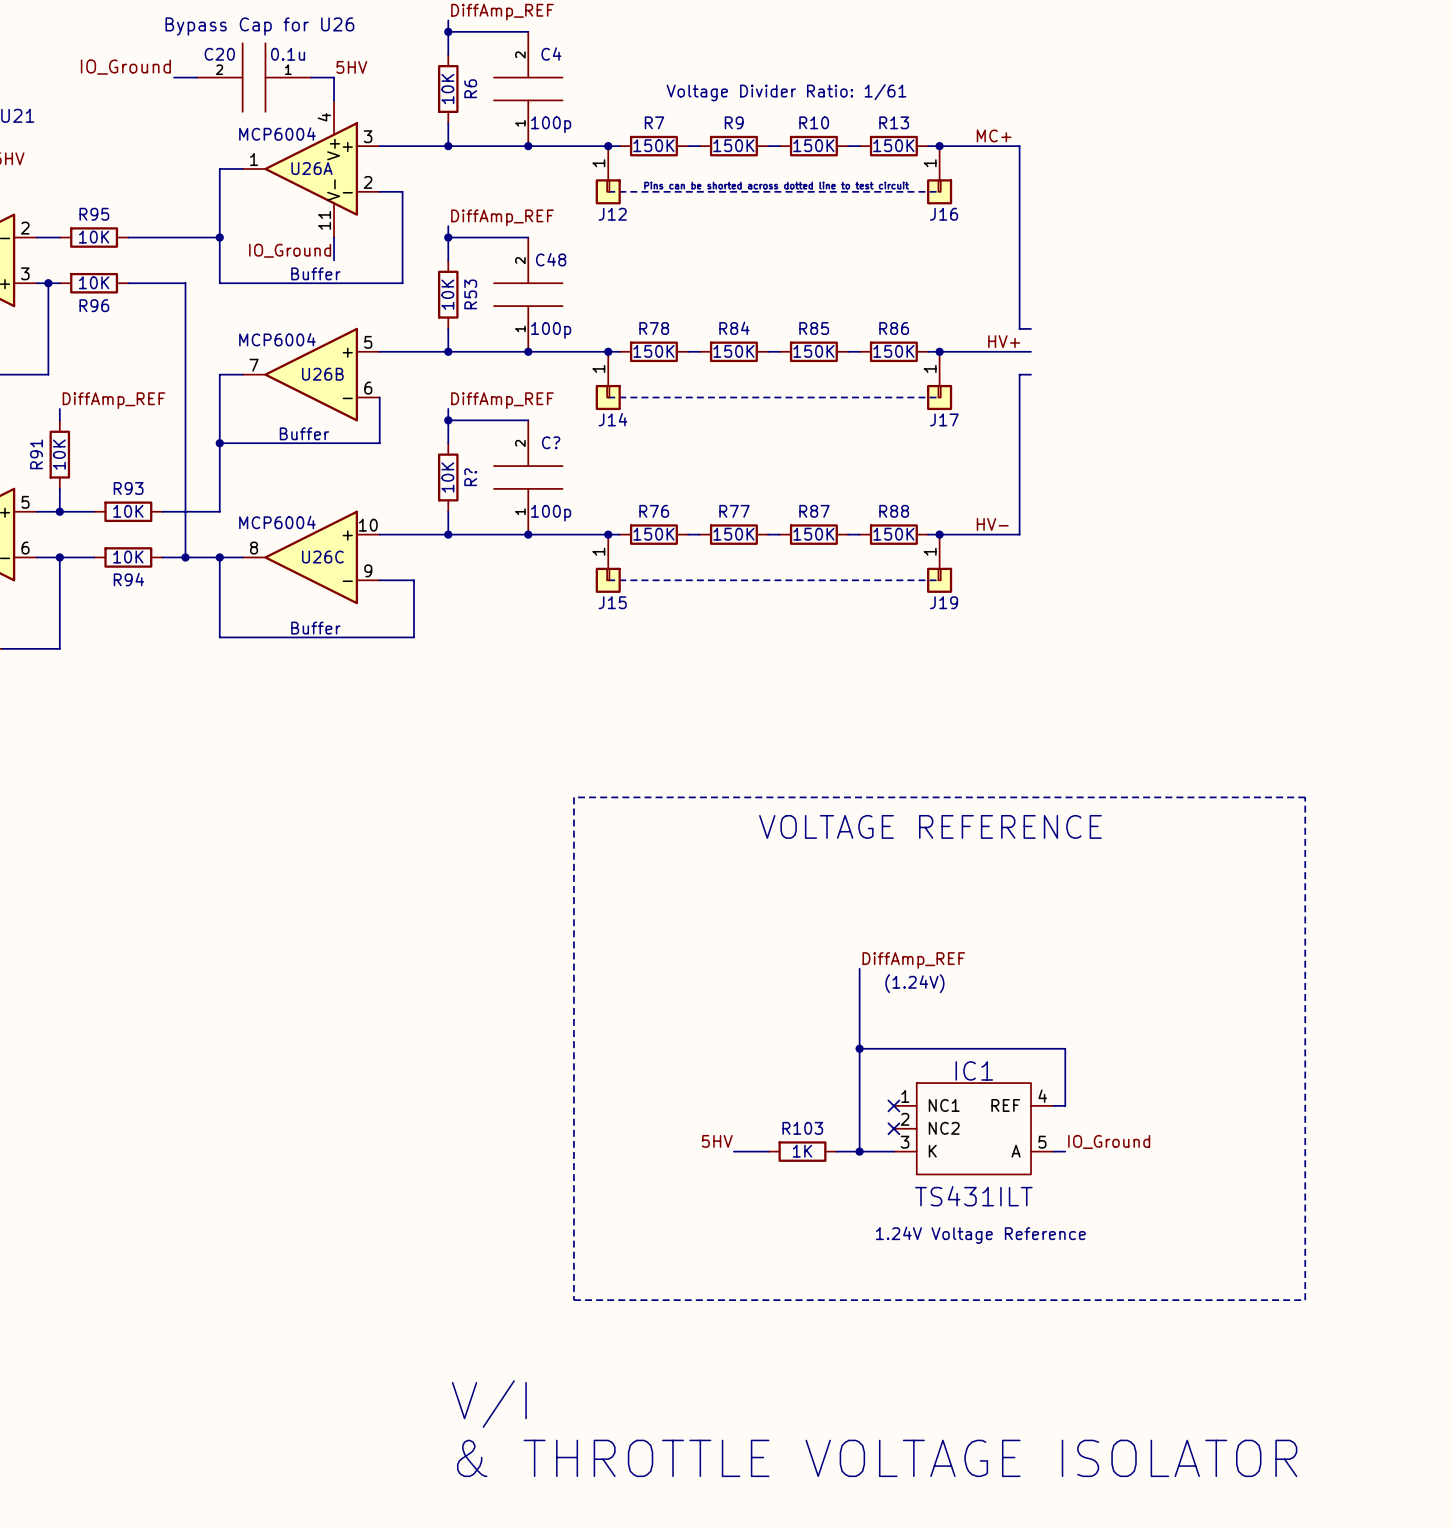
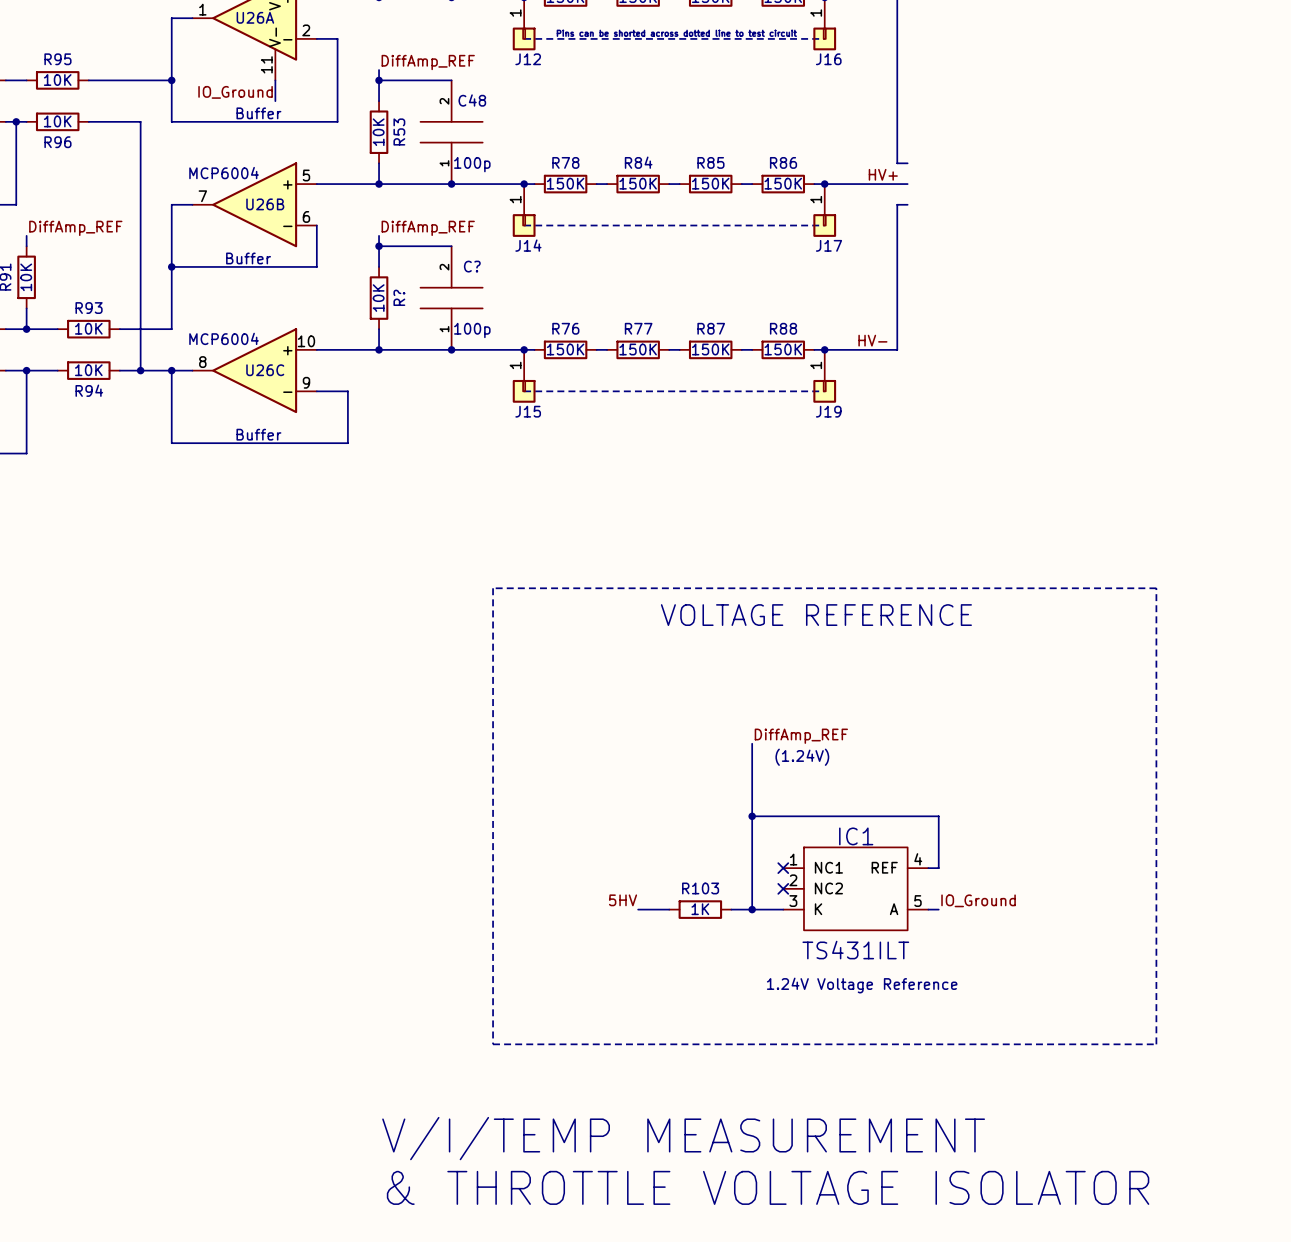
text: V/I (489, 1404) -> V/I/TEMP MEASUREMENT (683, 1138)

